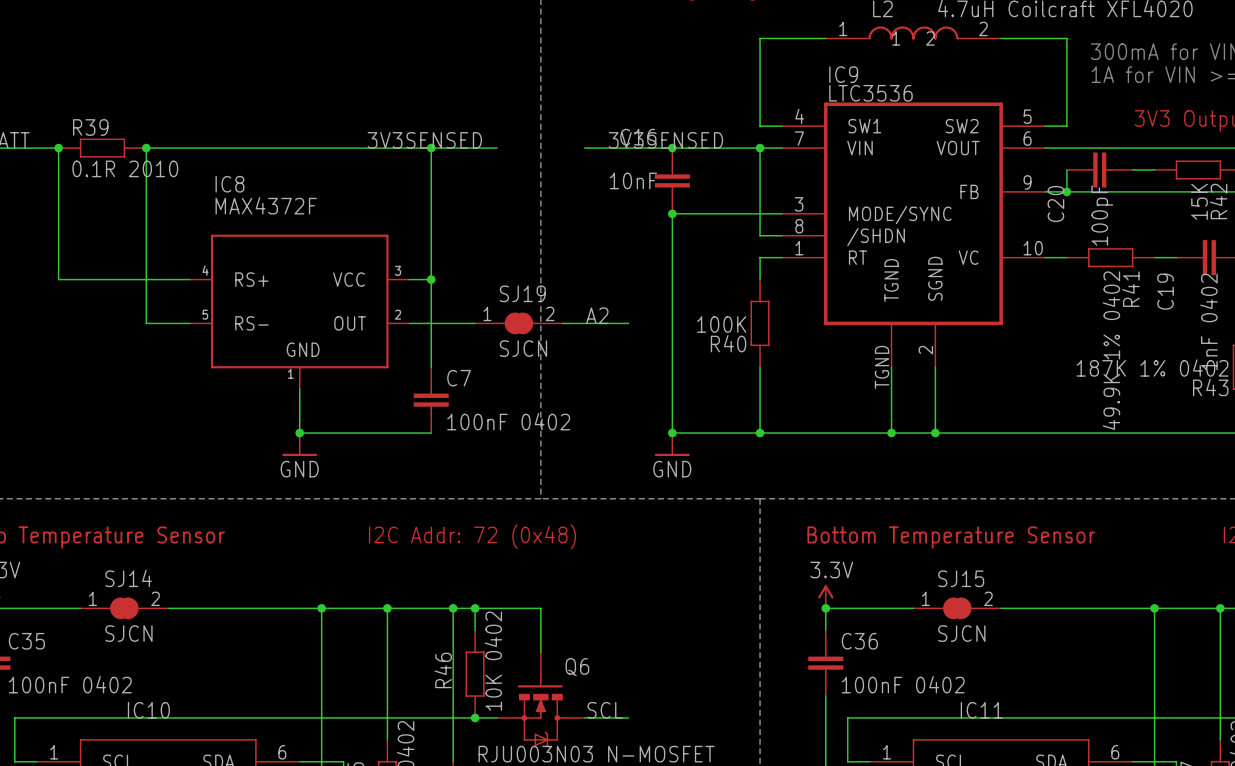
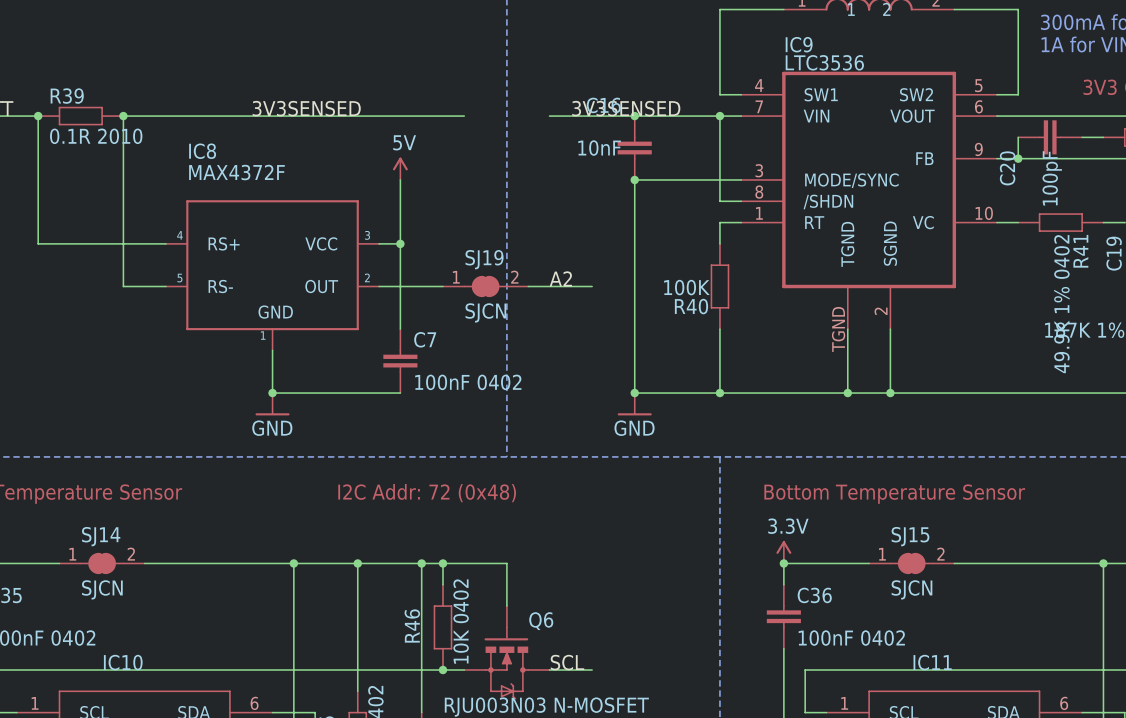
label position: 3V3SENSED (424, 140) -> 3V3SENSED (306, 108)
wire: (431, 148) (431, 213) -> none
junction: (431, 148) -> none
power symbol: none -> 5V (400, 168)

